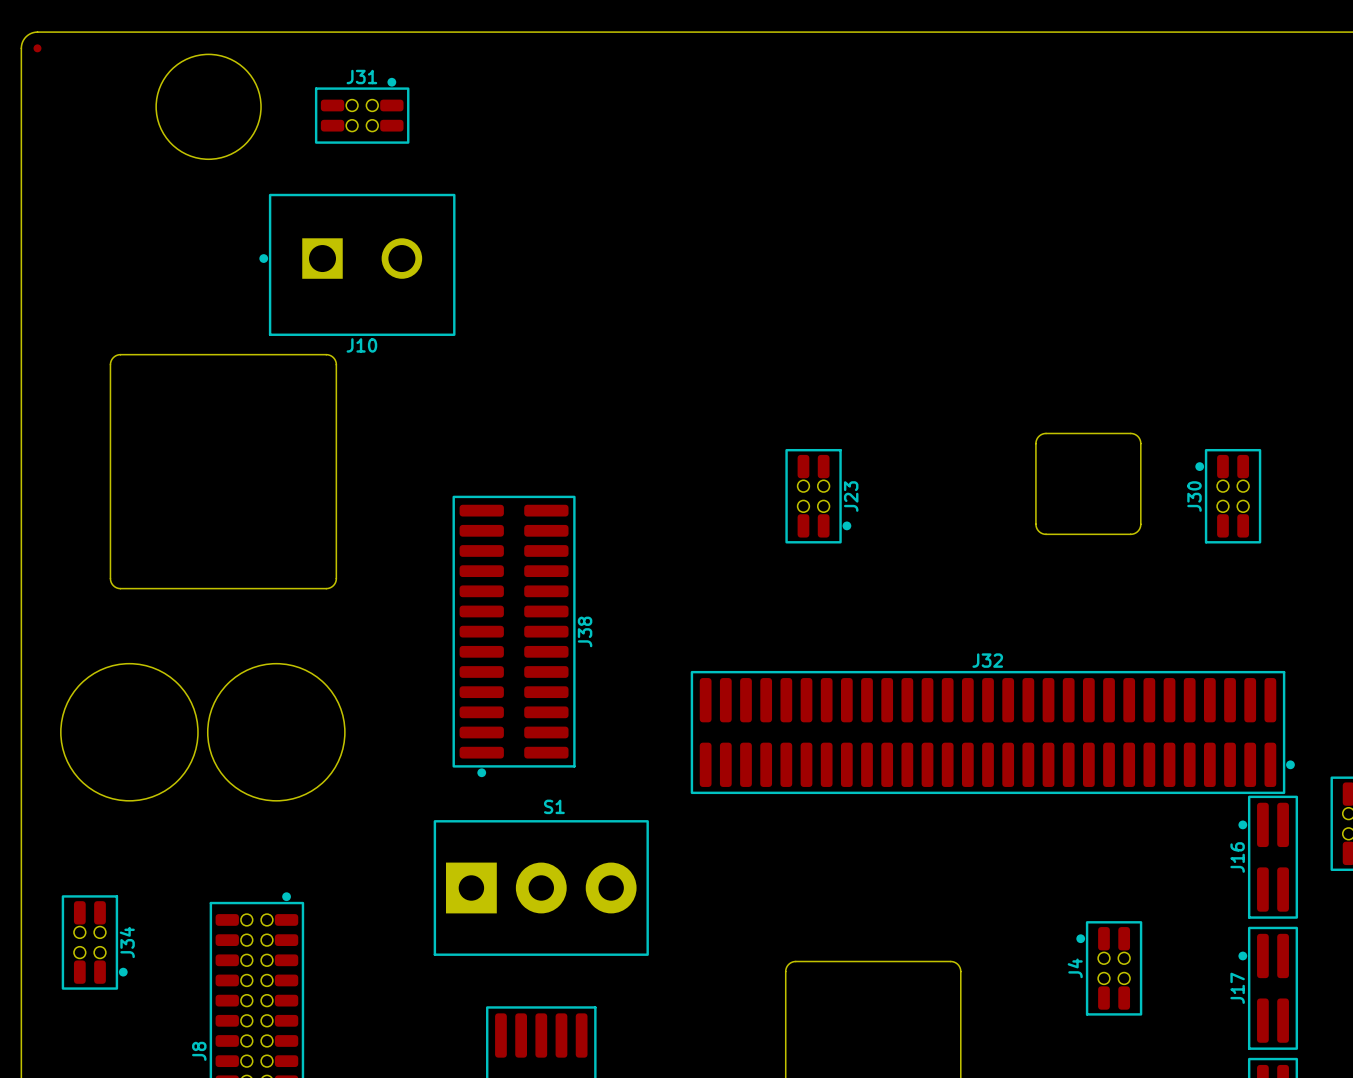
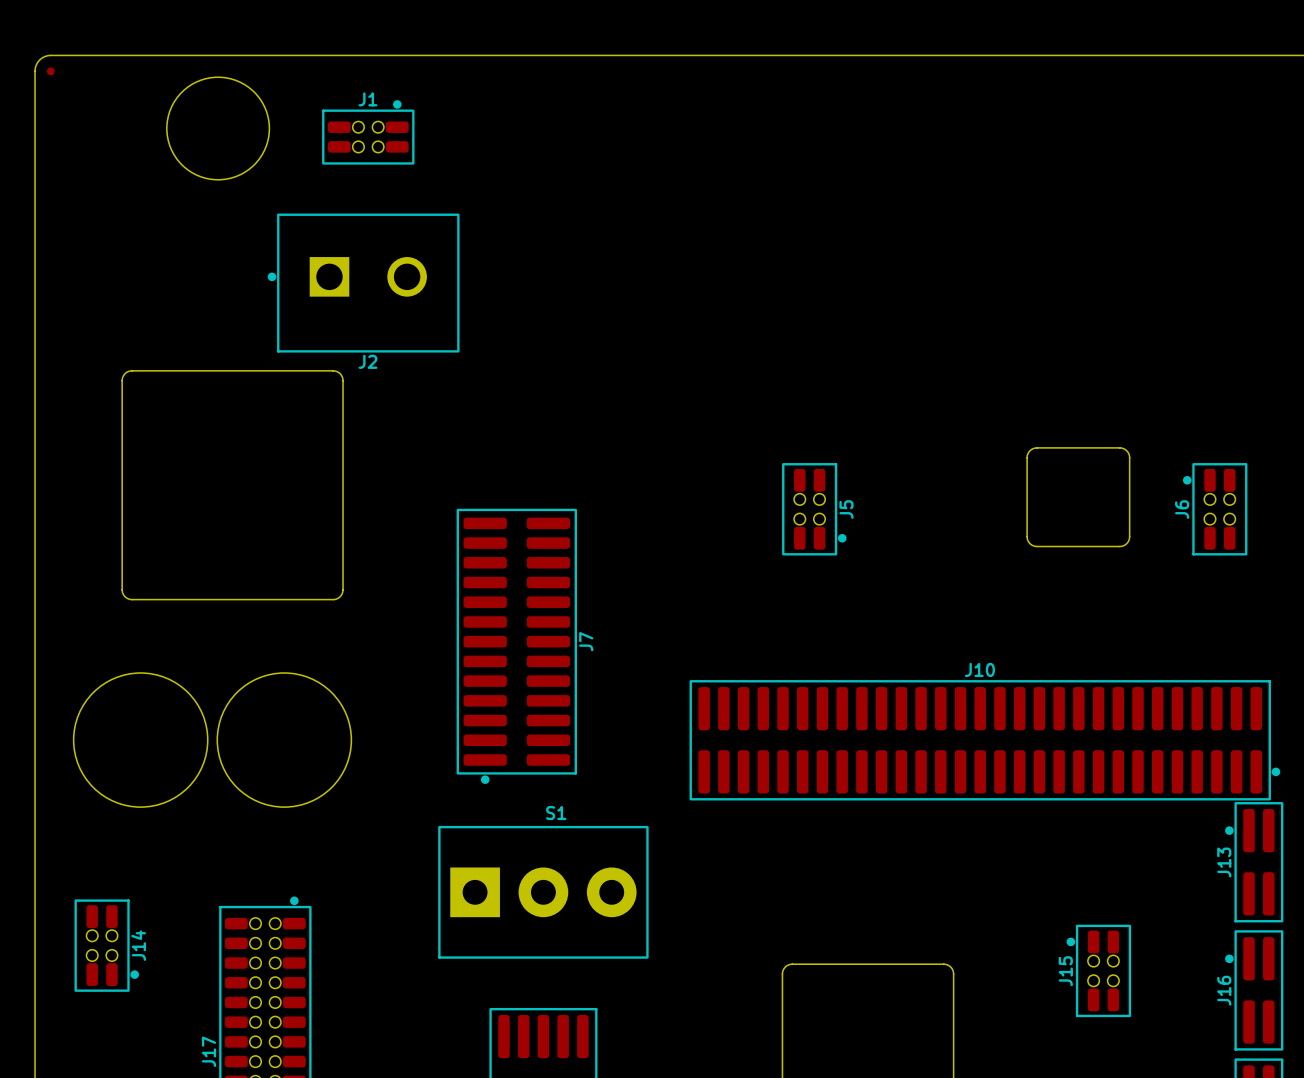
J31 name: J31 (361, 77) -> J1 (368, 99)
J10 name: J10 (361, 345) -> J2 (368, 361)
J23 name: J23 (851, 496) -> J5 (846, 509)
J30 name: J30 (1194, 496) -> J6 (1182, 509)
J38 name: J38 (585, 631) -> J7 (586, 641)
J32 name: J32 (987, 660) -> J10 (979, 669)
J16 name: J16 (1237, 857) -> J13 (1224, 862)
J34 name: J34 (127, 942) -> J14 (138, 945)
J4 name: J4 (1075, 968) -> J15 (1065, 971)
J17 name: J17 (1237, 988) -> J16 (1224, 990)
J8 name: J8 (199, 1051) -> J17 (209, 1051)

